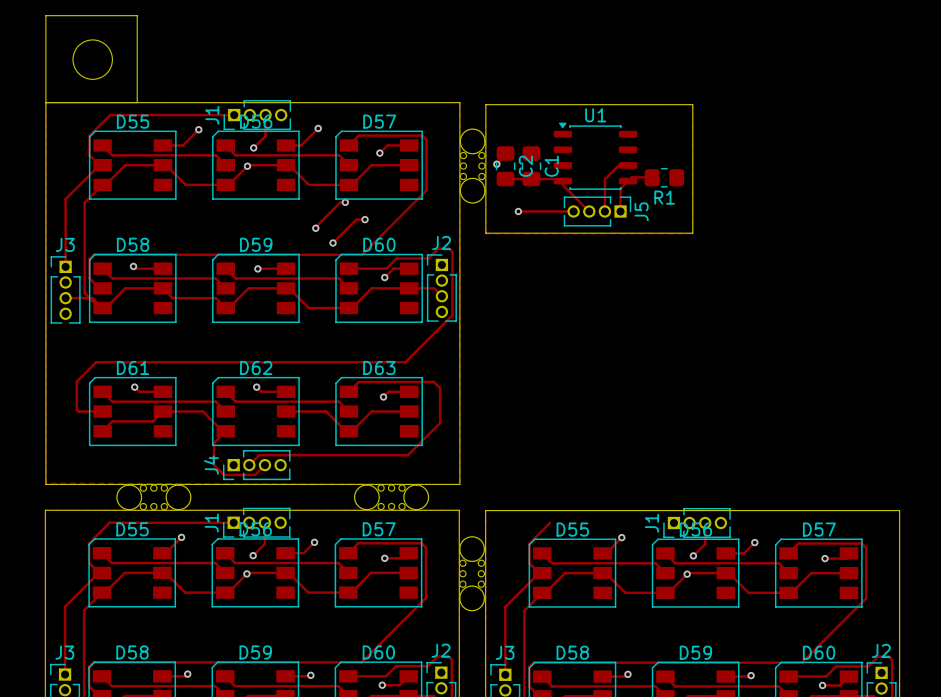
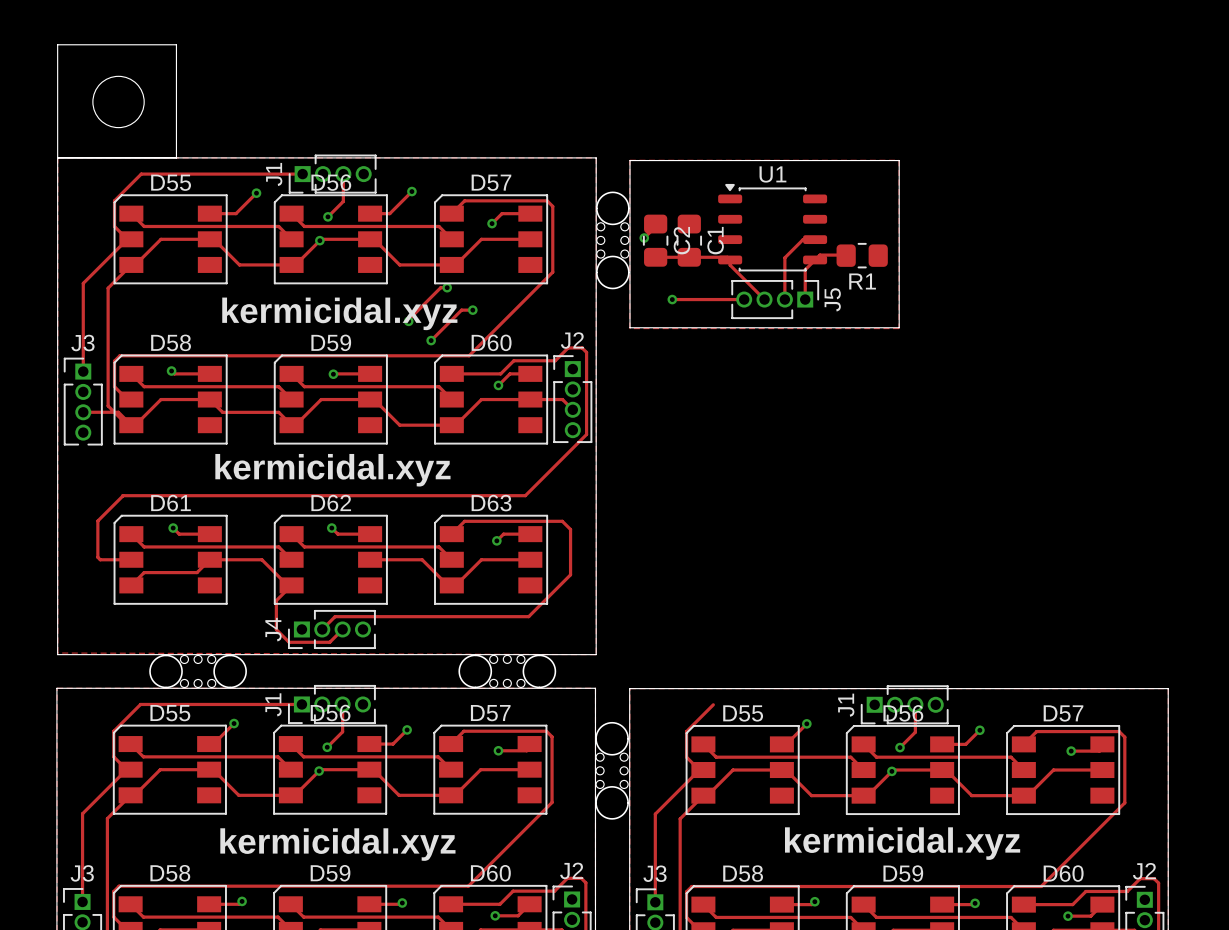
text: none -> kermicidal.xyz (339, 313)
text: none -> kermicidal.xyz (332, 470)
text: none -> kermicidal.xyz (902, 843)
text: none -> kermicidal.xyz (337, 844)

